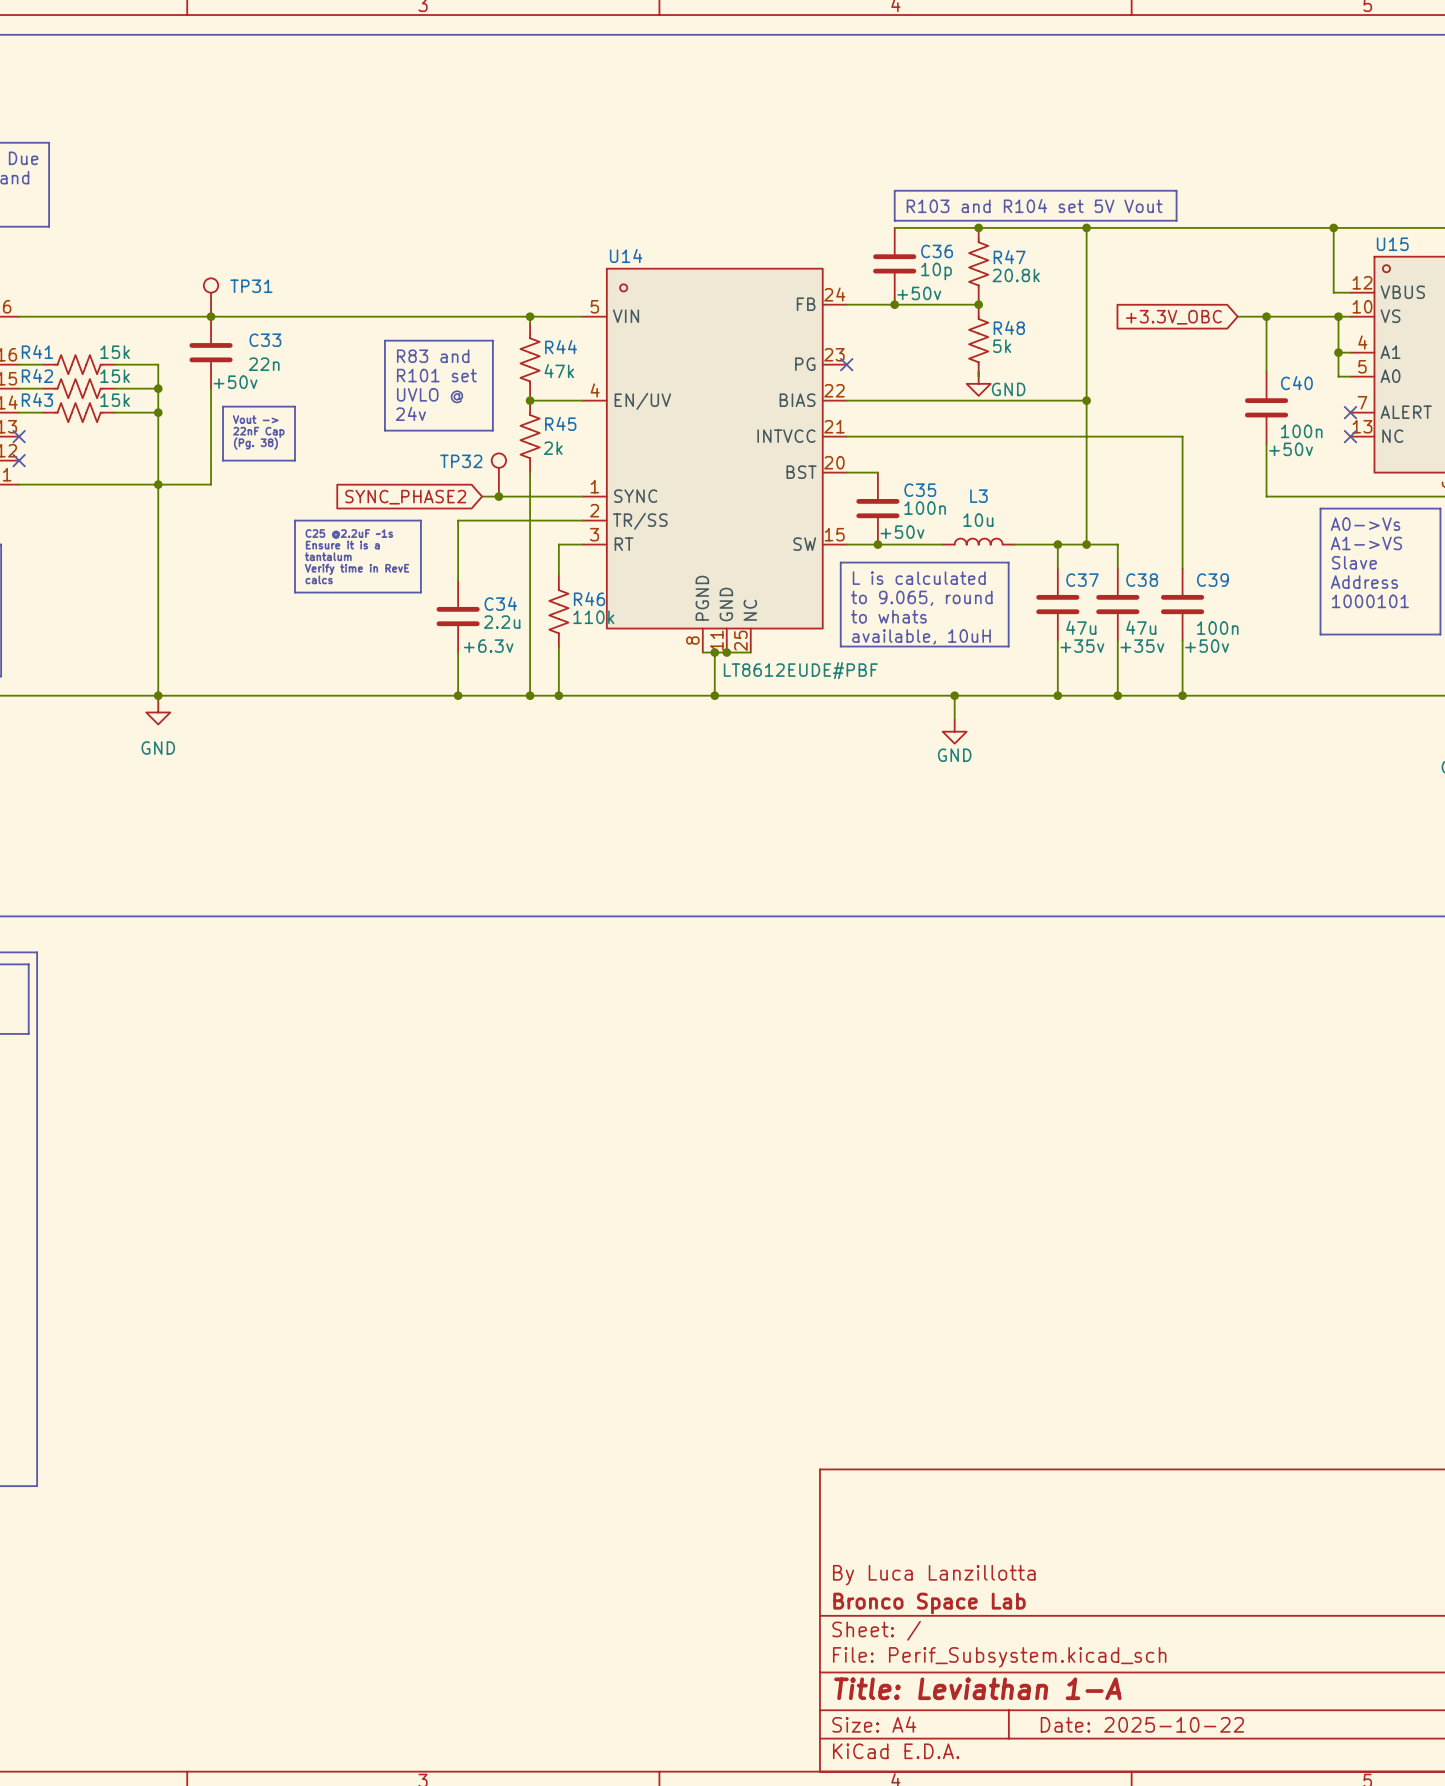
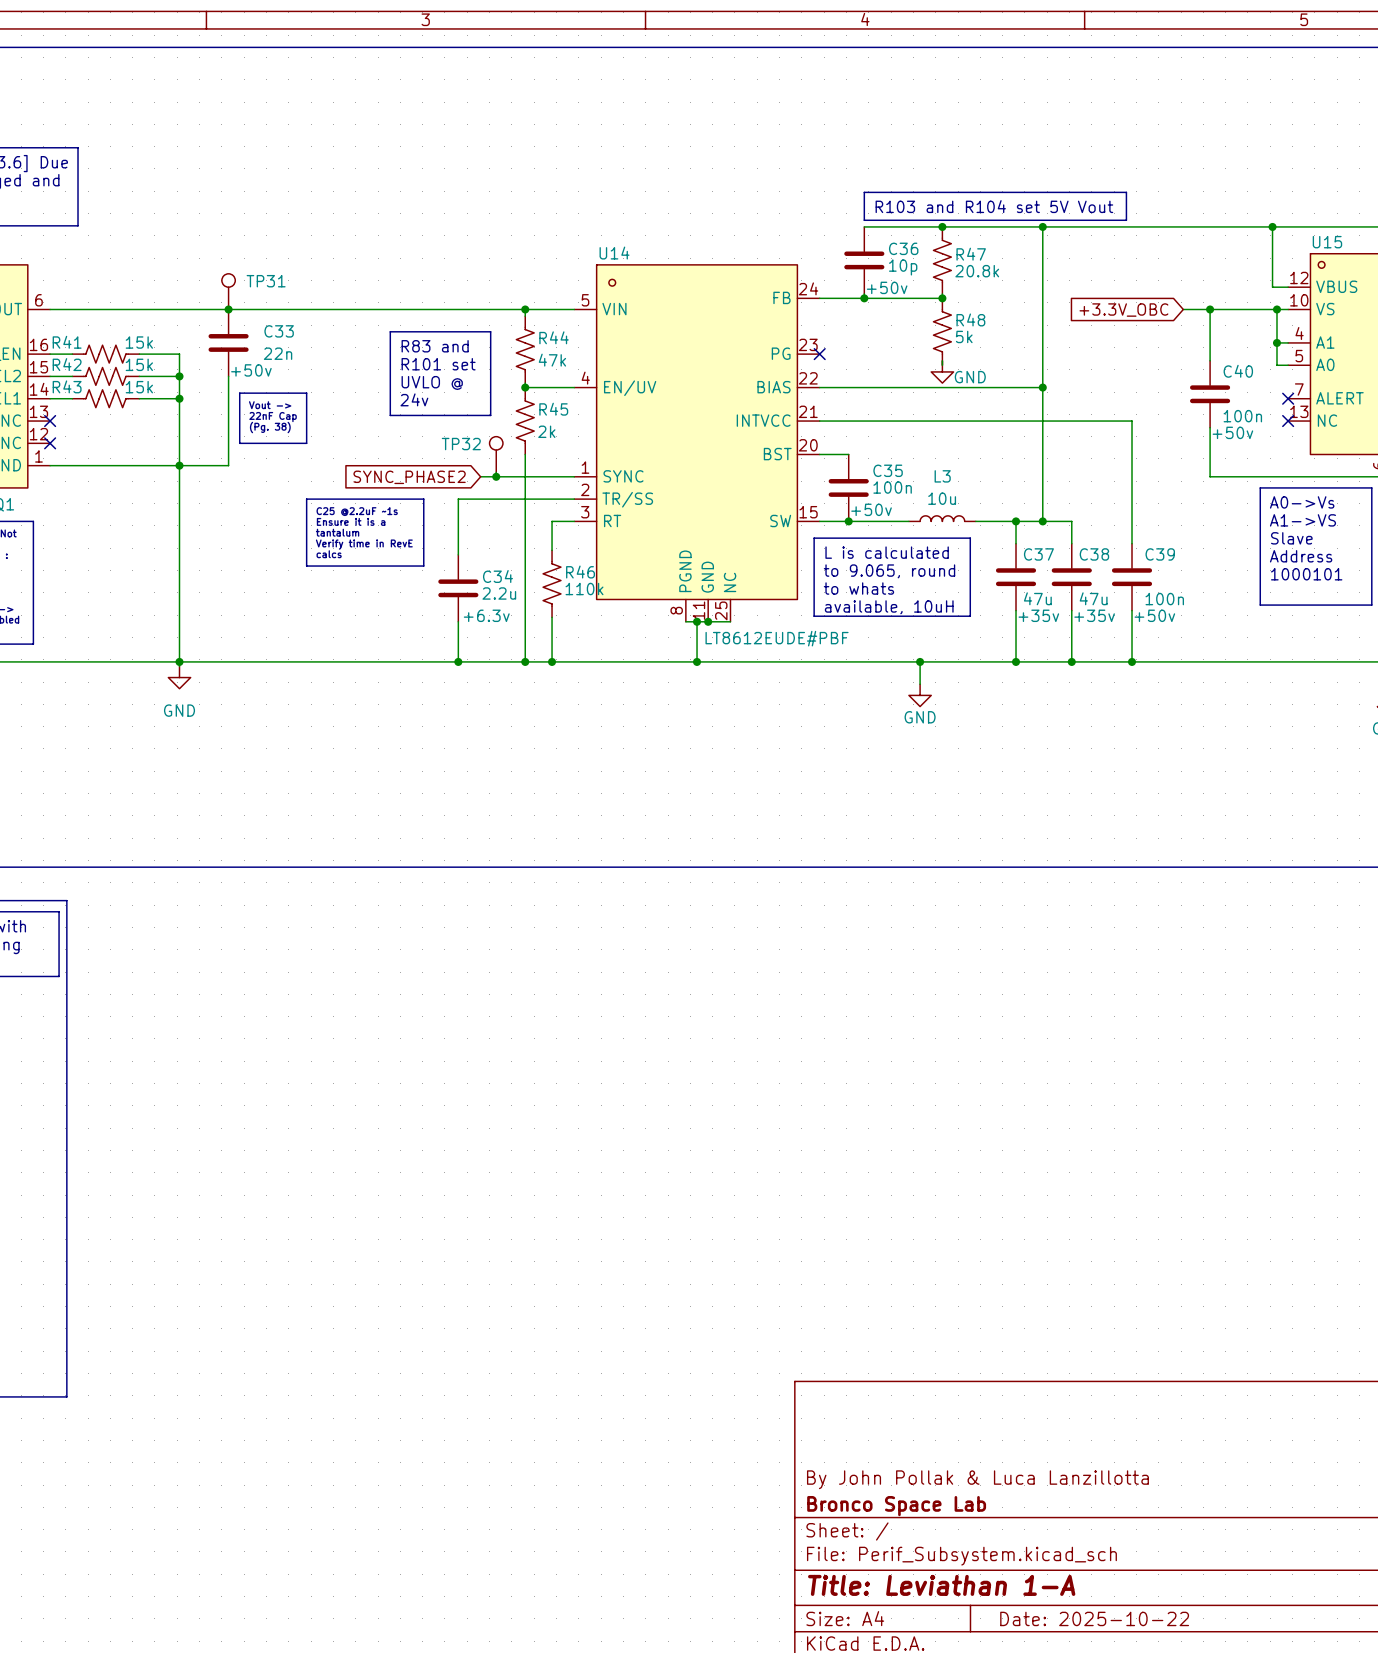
title block: By Luca Lanzillotta (934, 1575) -> By John Pollak & Luca Lanzillotta (977, 1479)

